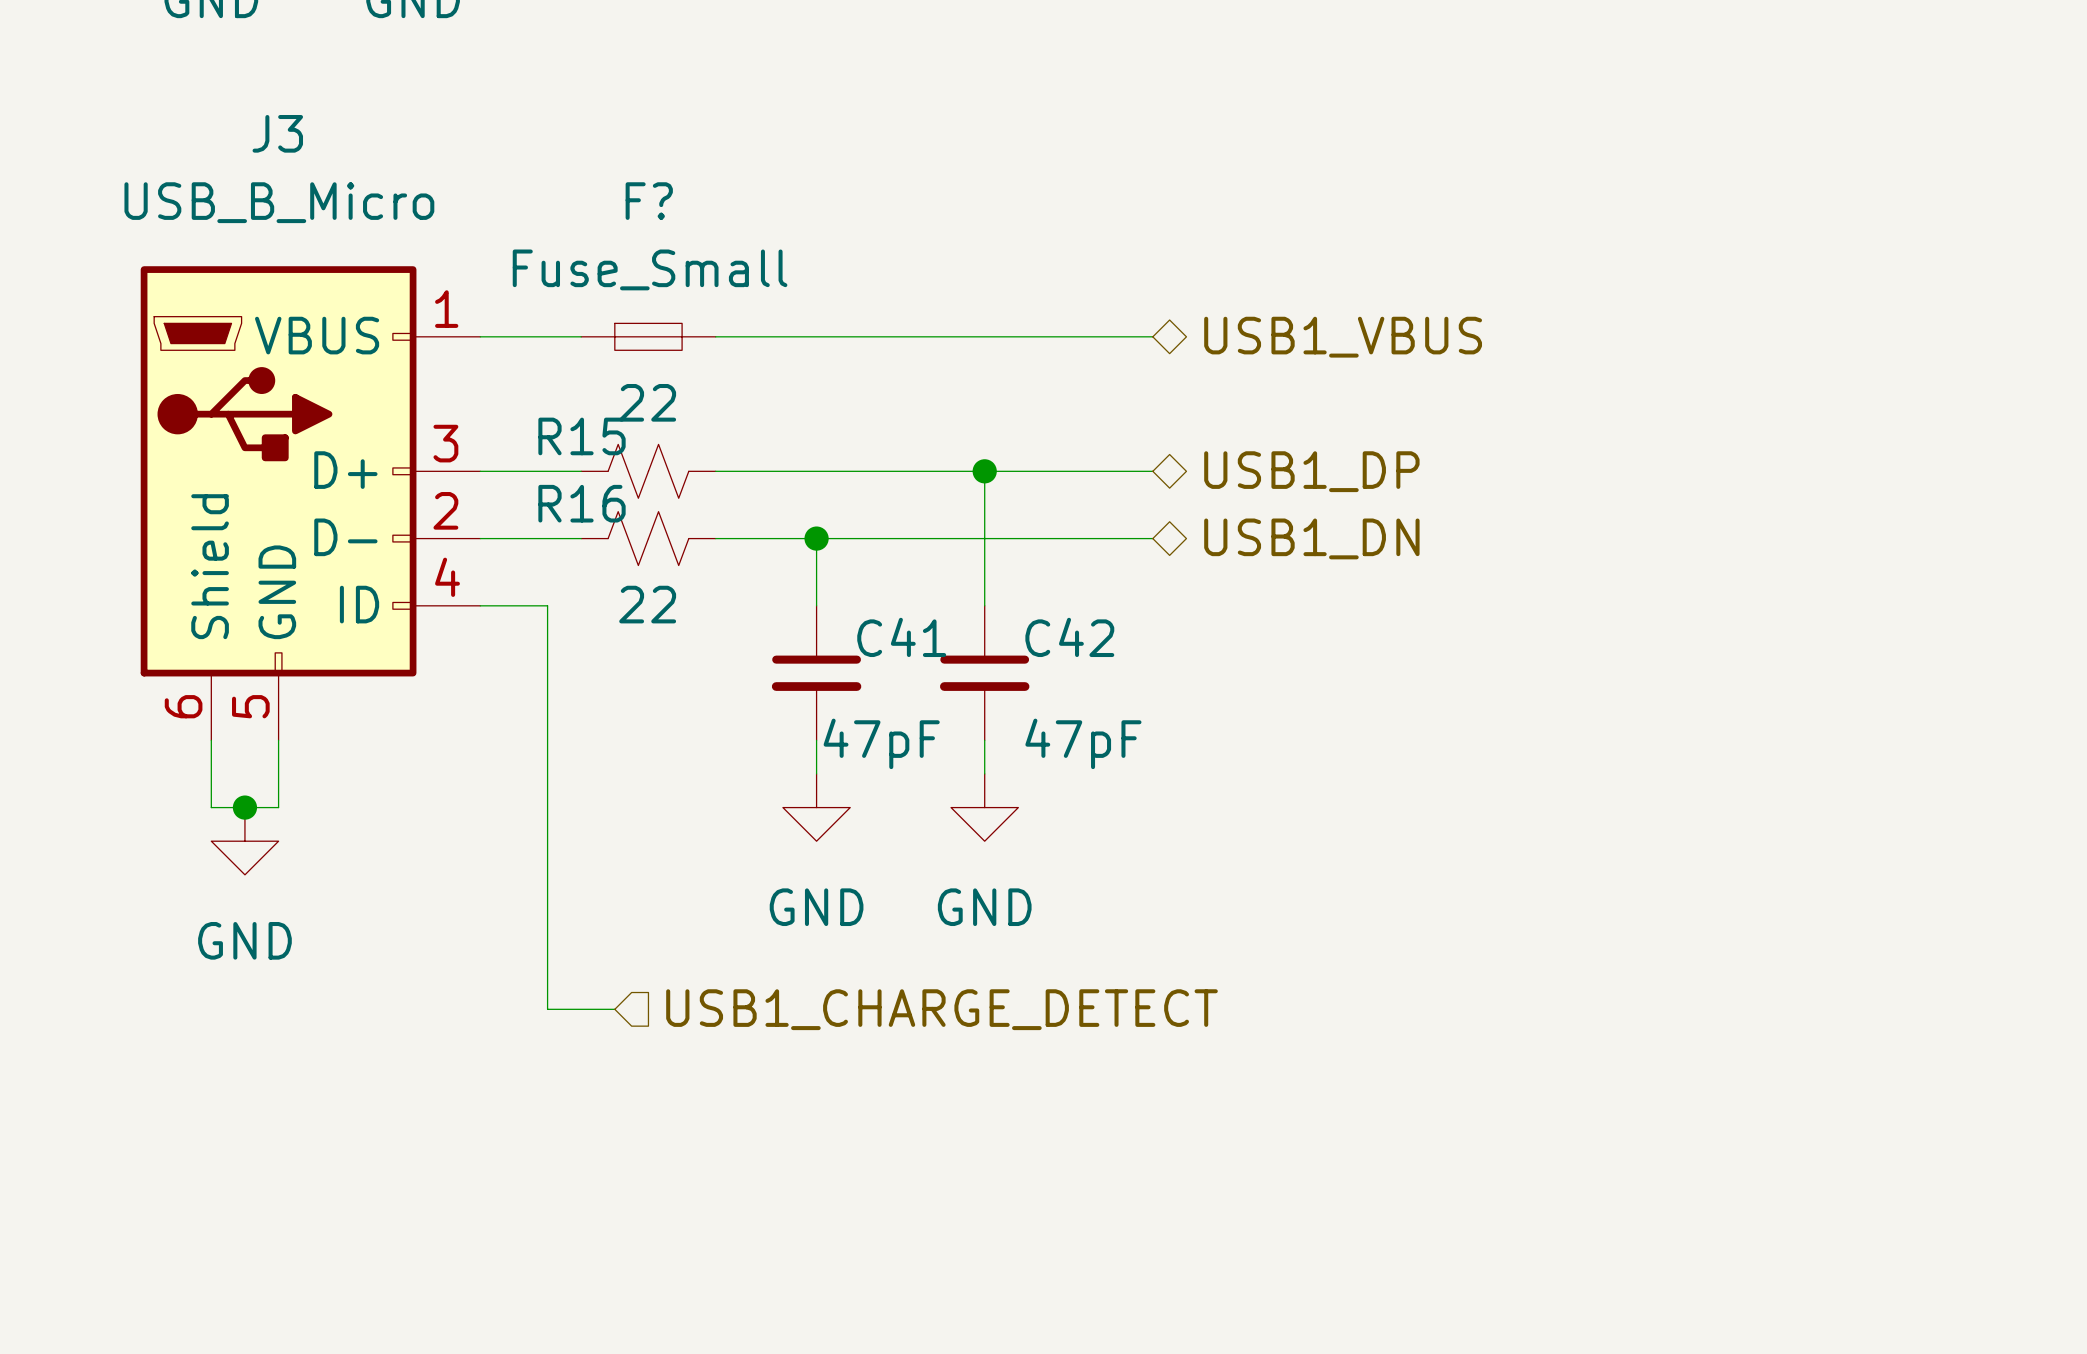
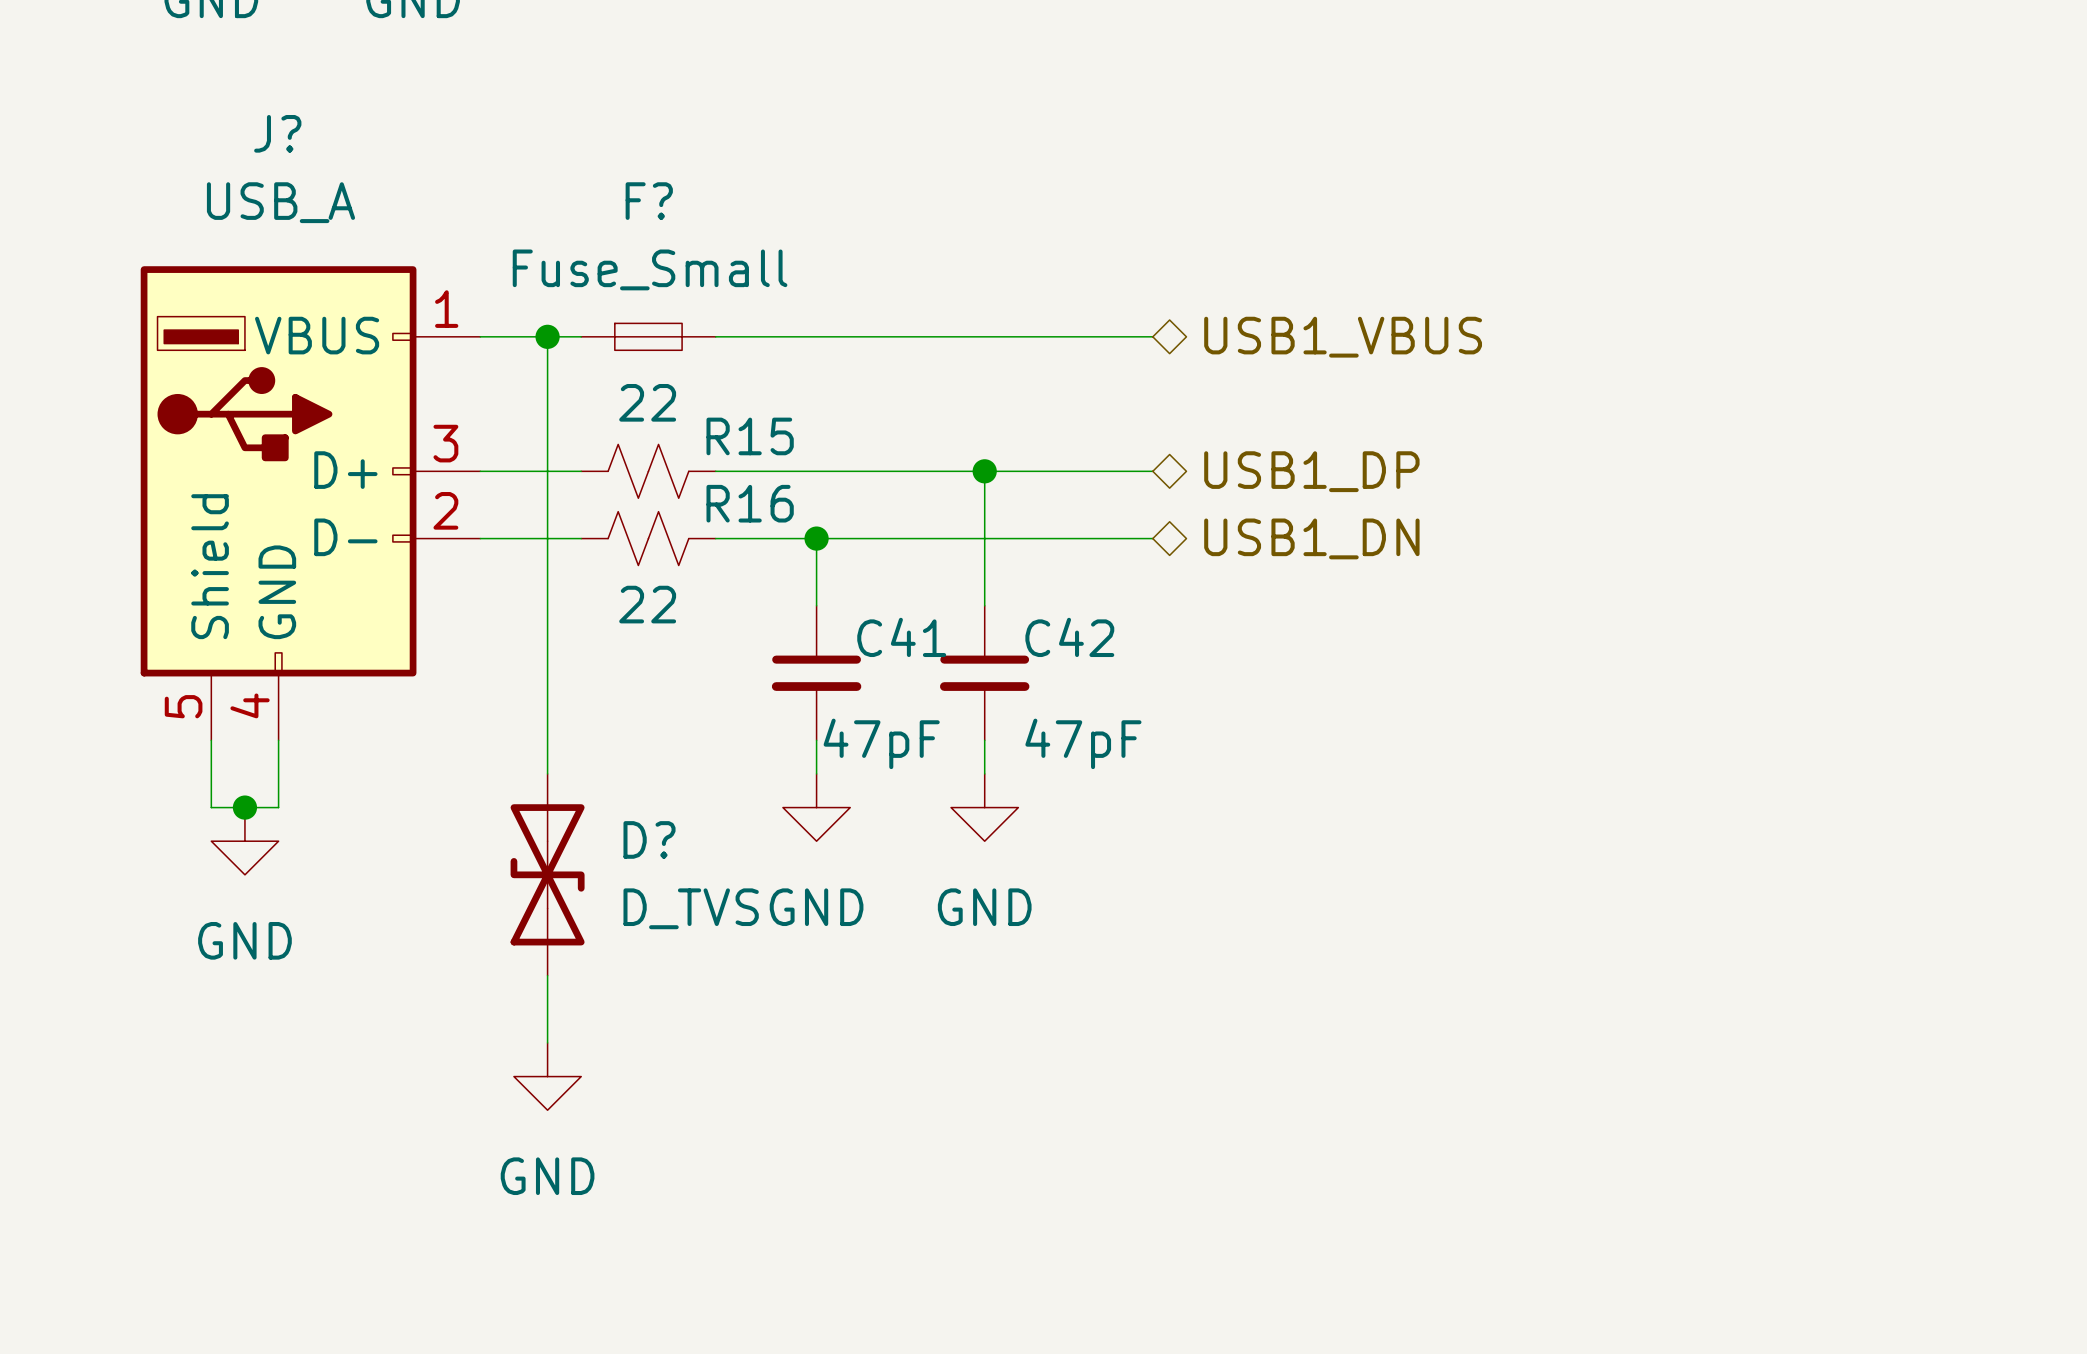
junction: none -> (547, 336)
R15 name position: R15 (582, 436) -> R15 (750, 436)
J3: USB_B_Micro (310, 503) -> none
J?: none -> USB_A (310, 503)
R16 name position: R16 (582, 503) -> R16 (750, 503)
wire: (480, 605) (547, 605) -> (547, 336) (547, 605)
D?: none -> D_TVS (547, 874)
wire: (547, 1009) (614, 1009) -> (547, 1009) (547, 1042)
hierarchical label: USB1_CHARGE_DETECT (942, 1009) -> none
power symbol: none -> GND (547, 1076)

